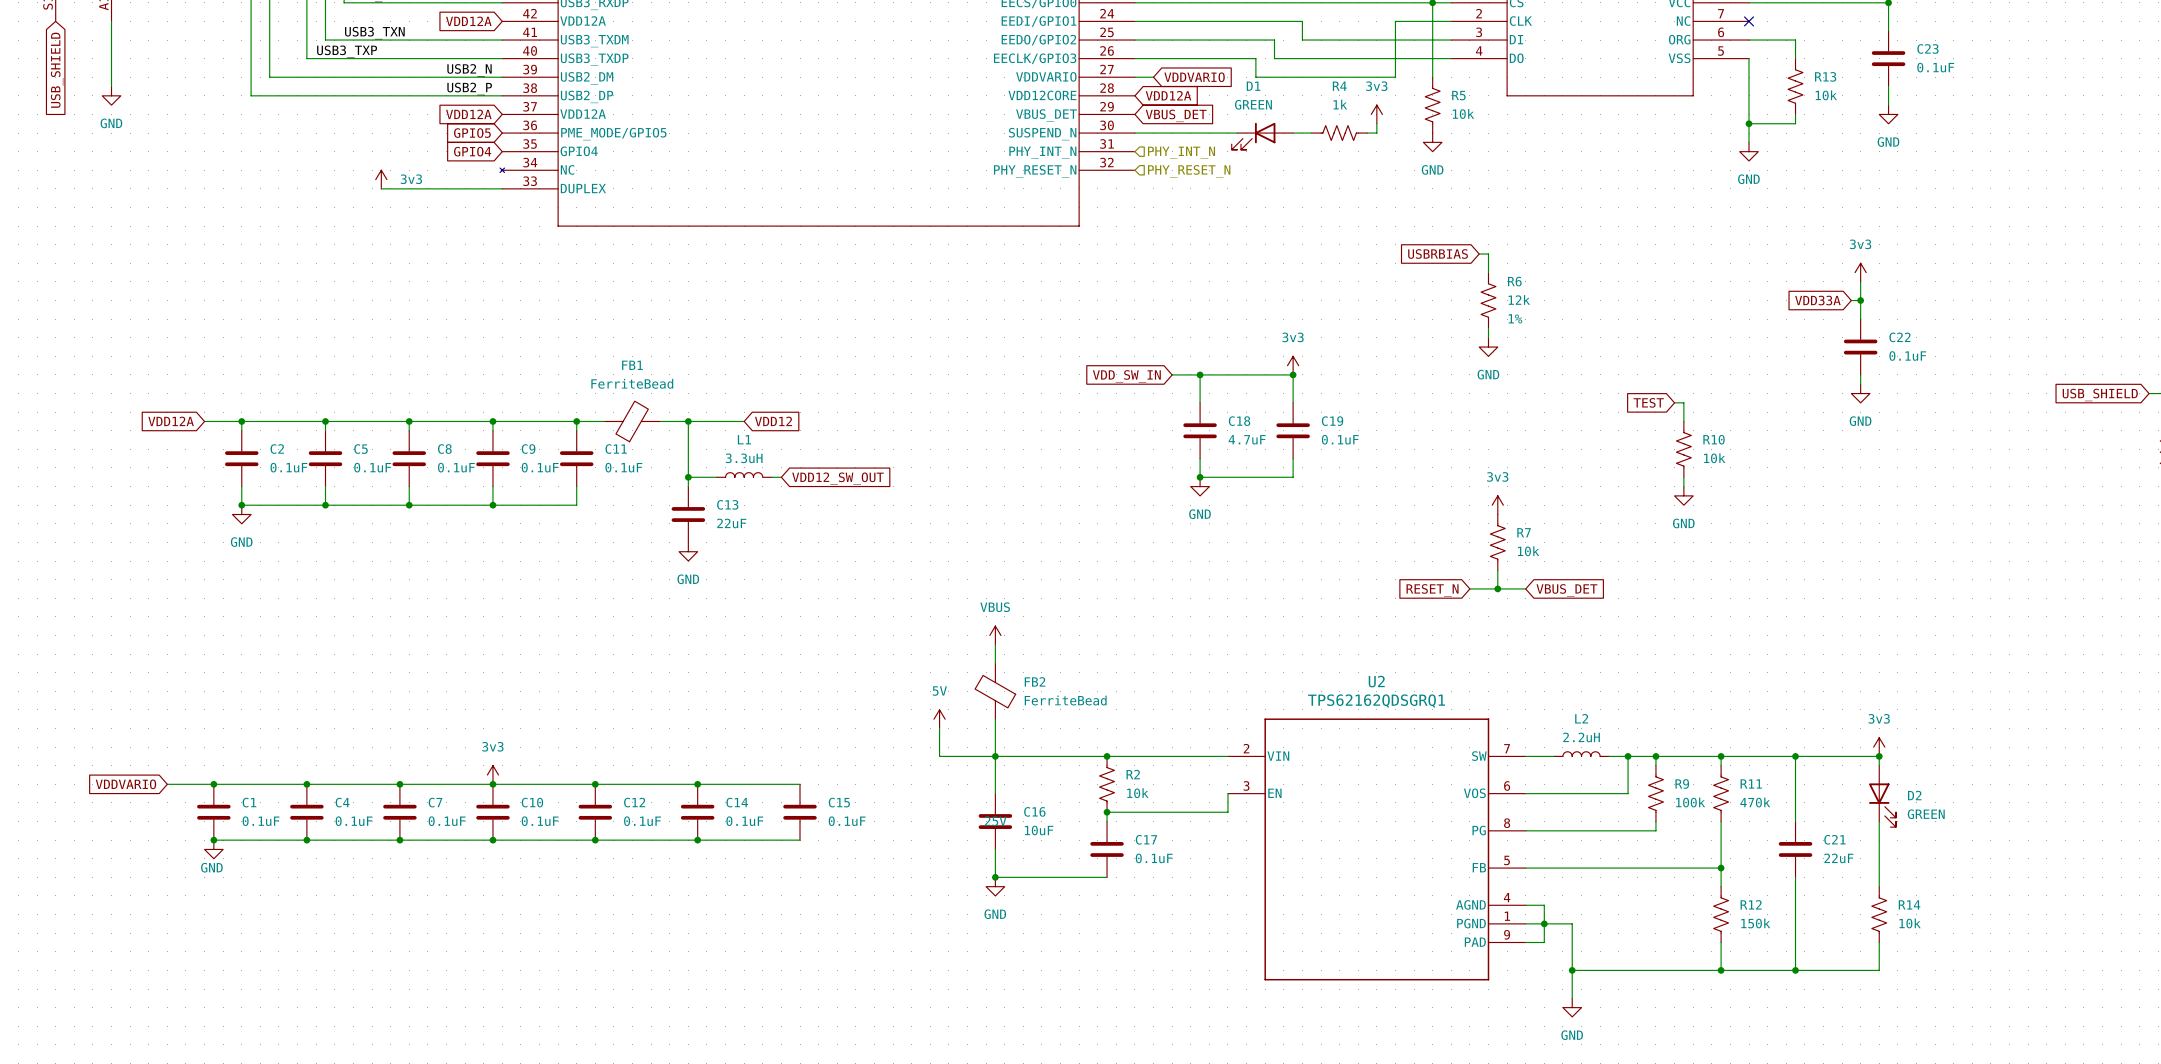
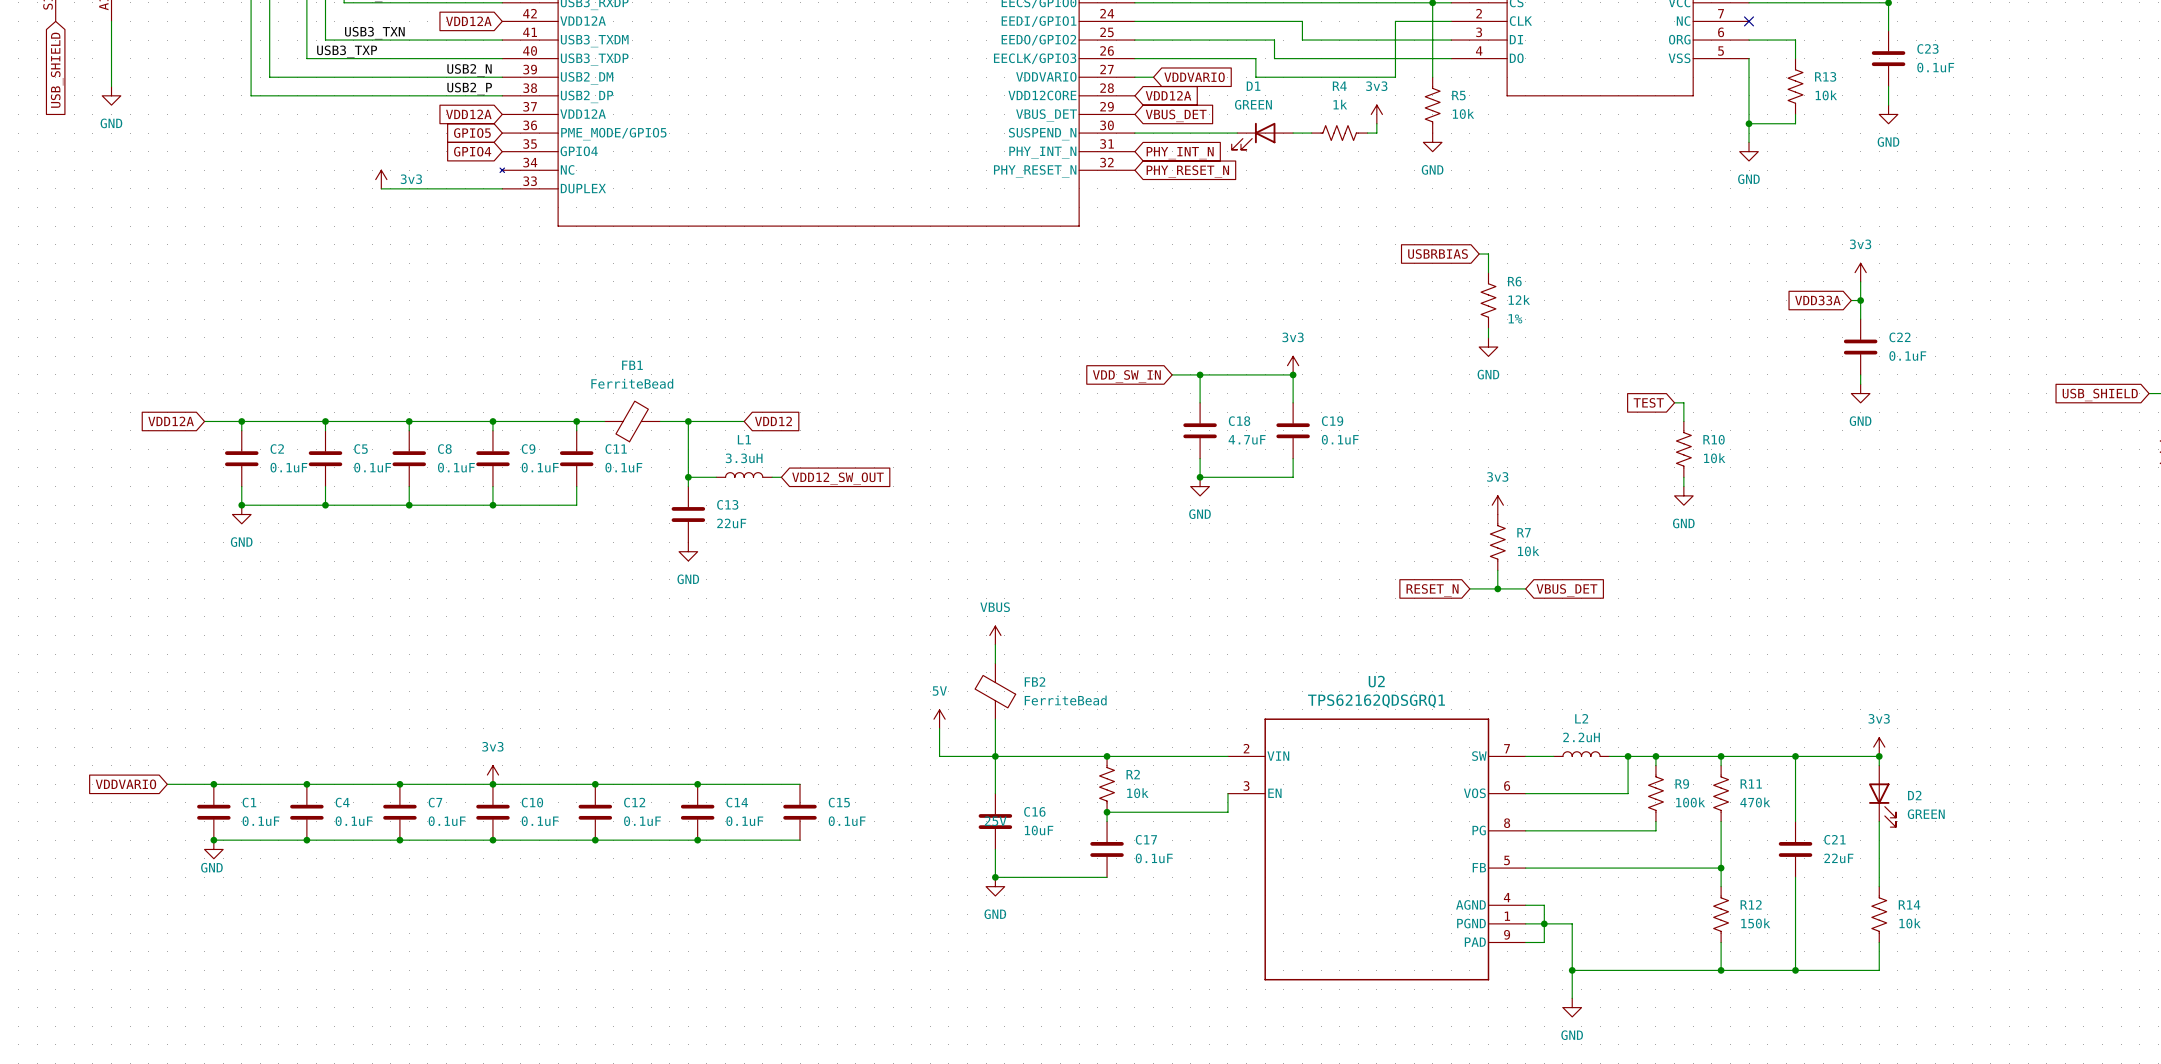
hierarchical label: PHY_INT_N (1181, 152) -> none
global label: none -> PHY_INT_N (1180, 153)
global label: none -> PHY_RESET_N (1187, 171)
hierarchical label: PHY_RESET_N (1189, 171) -> none

